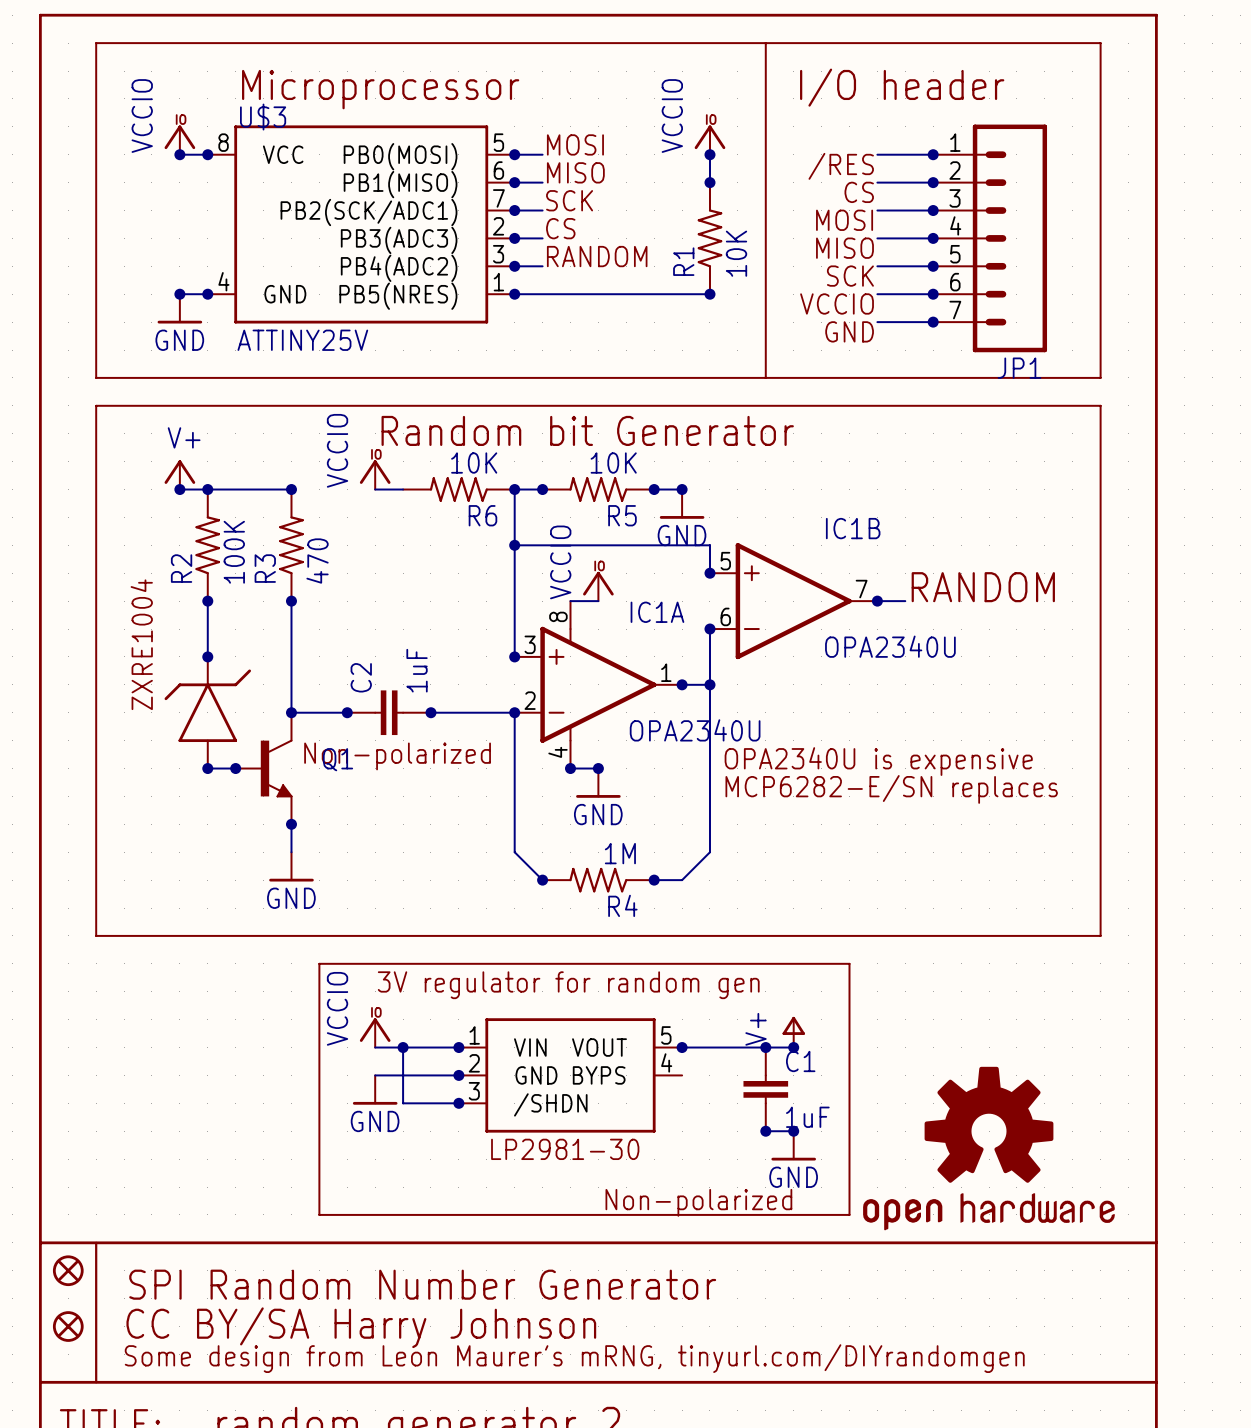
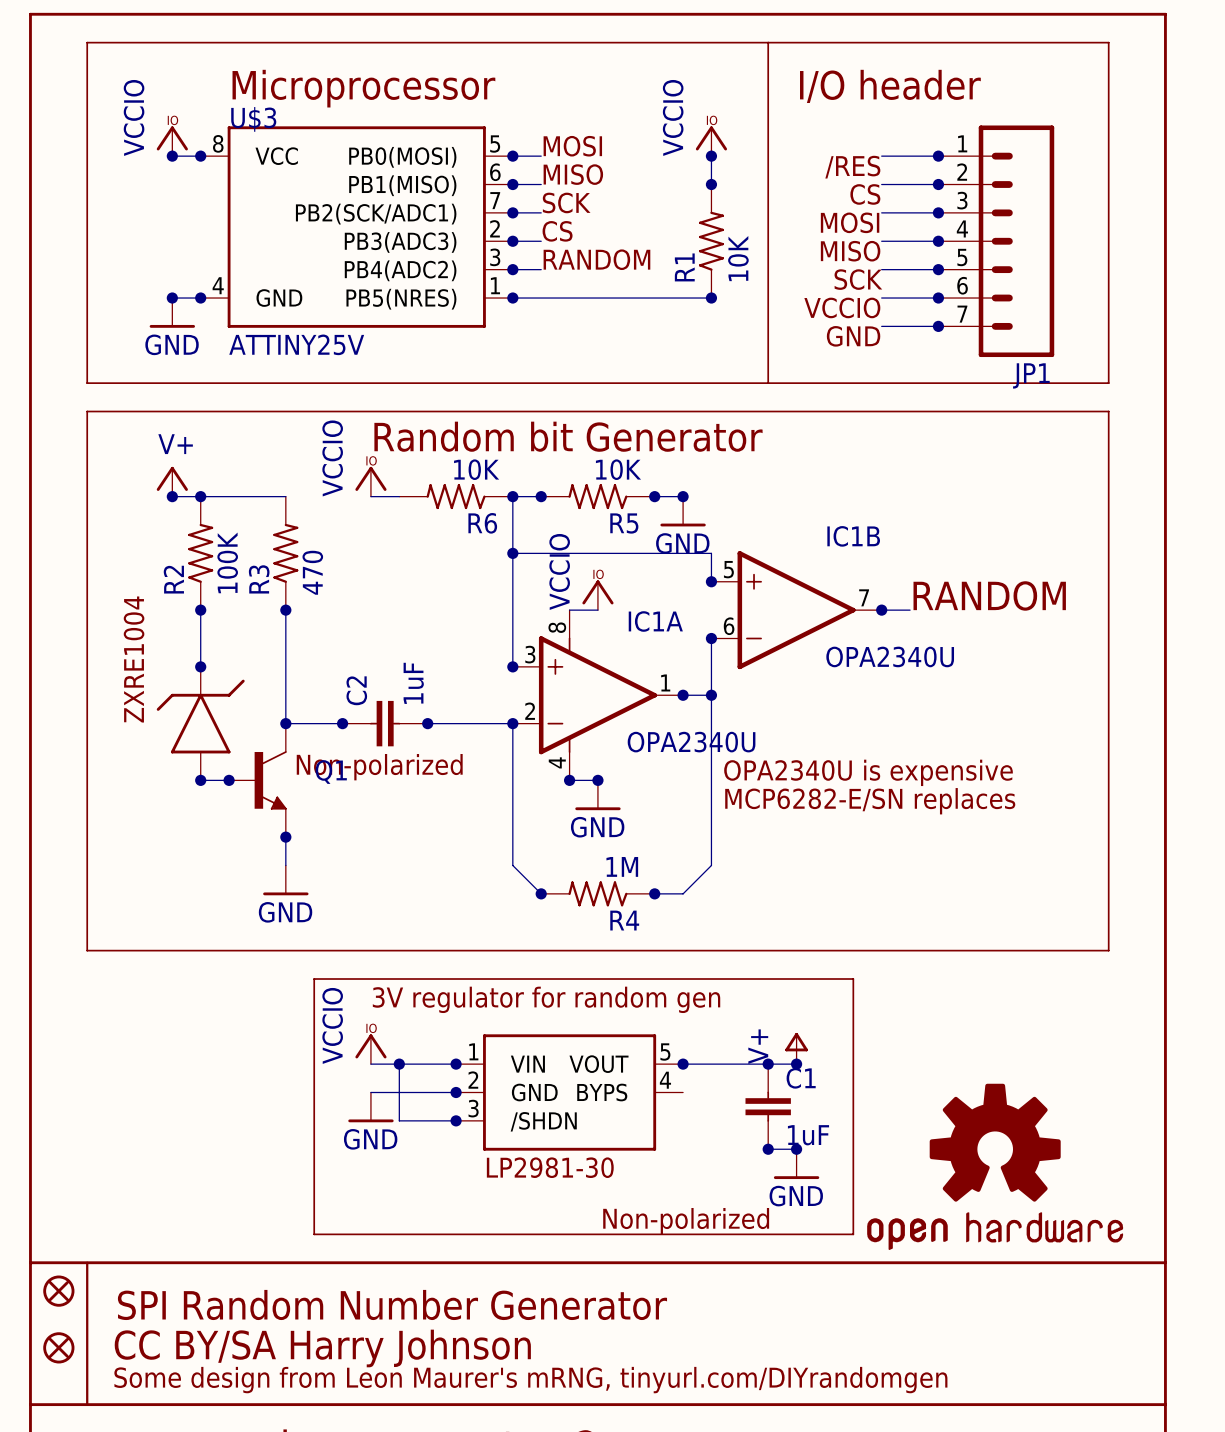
junction: (291, 489) -> none

